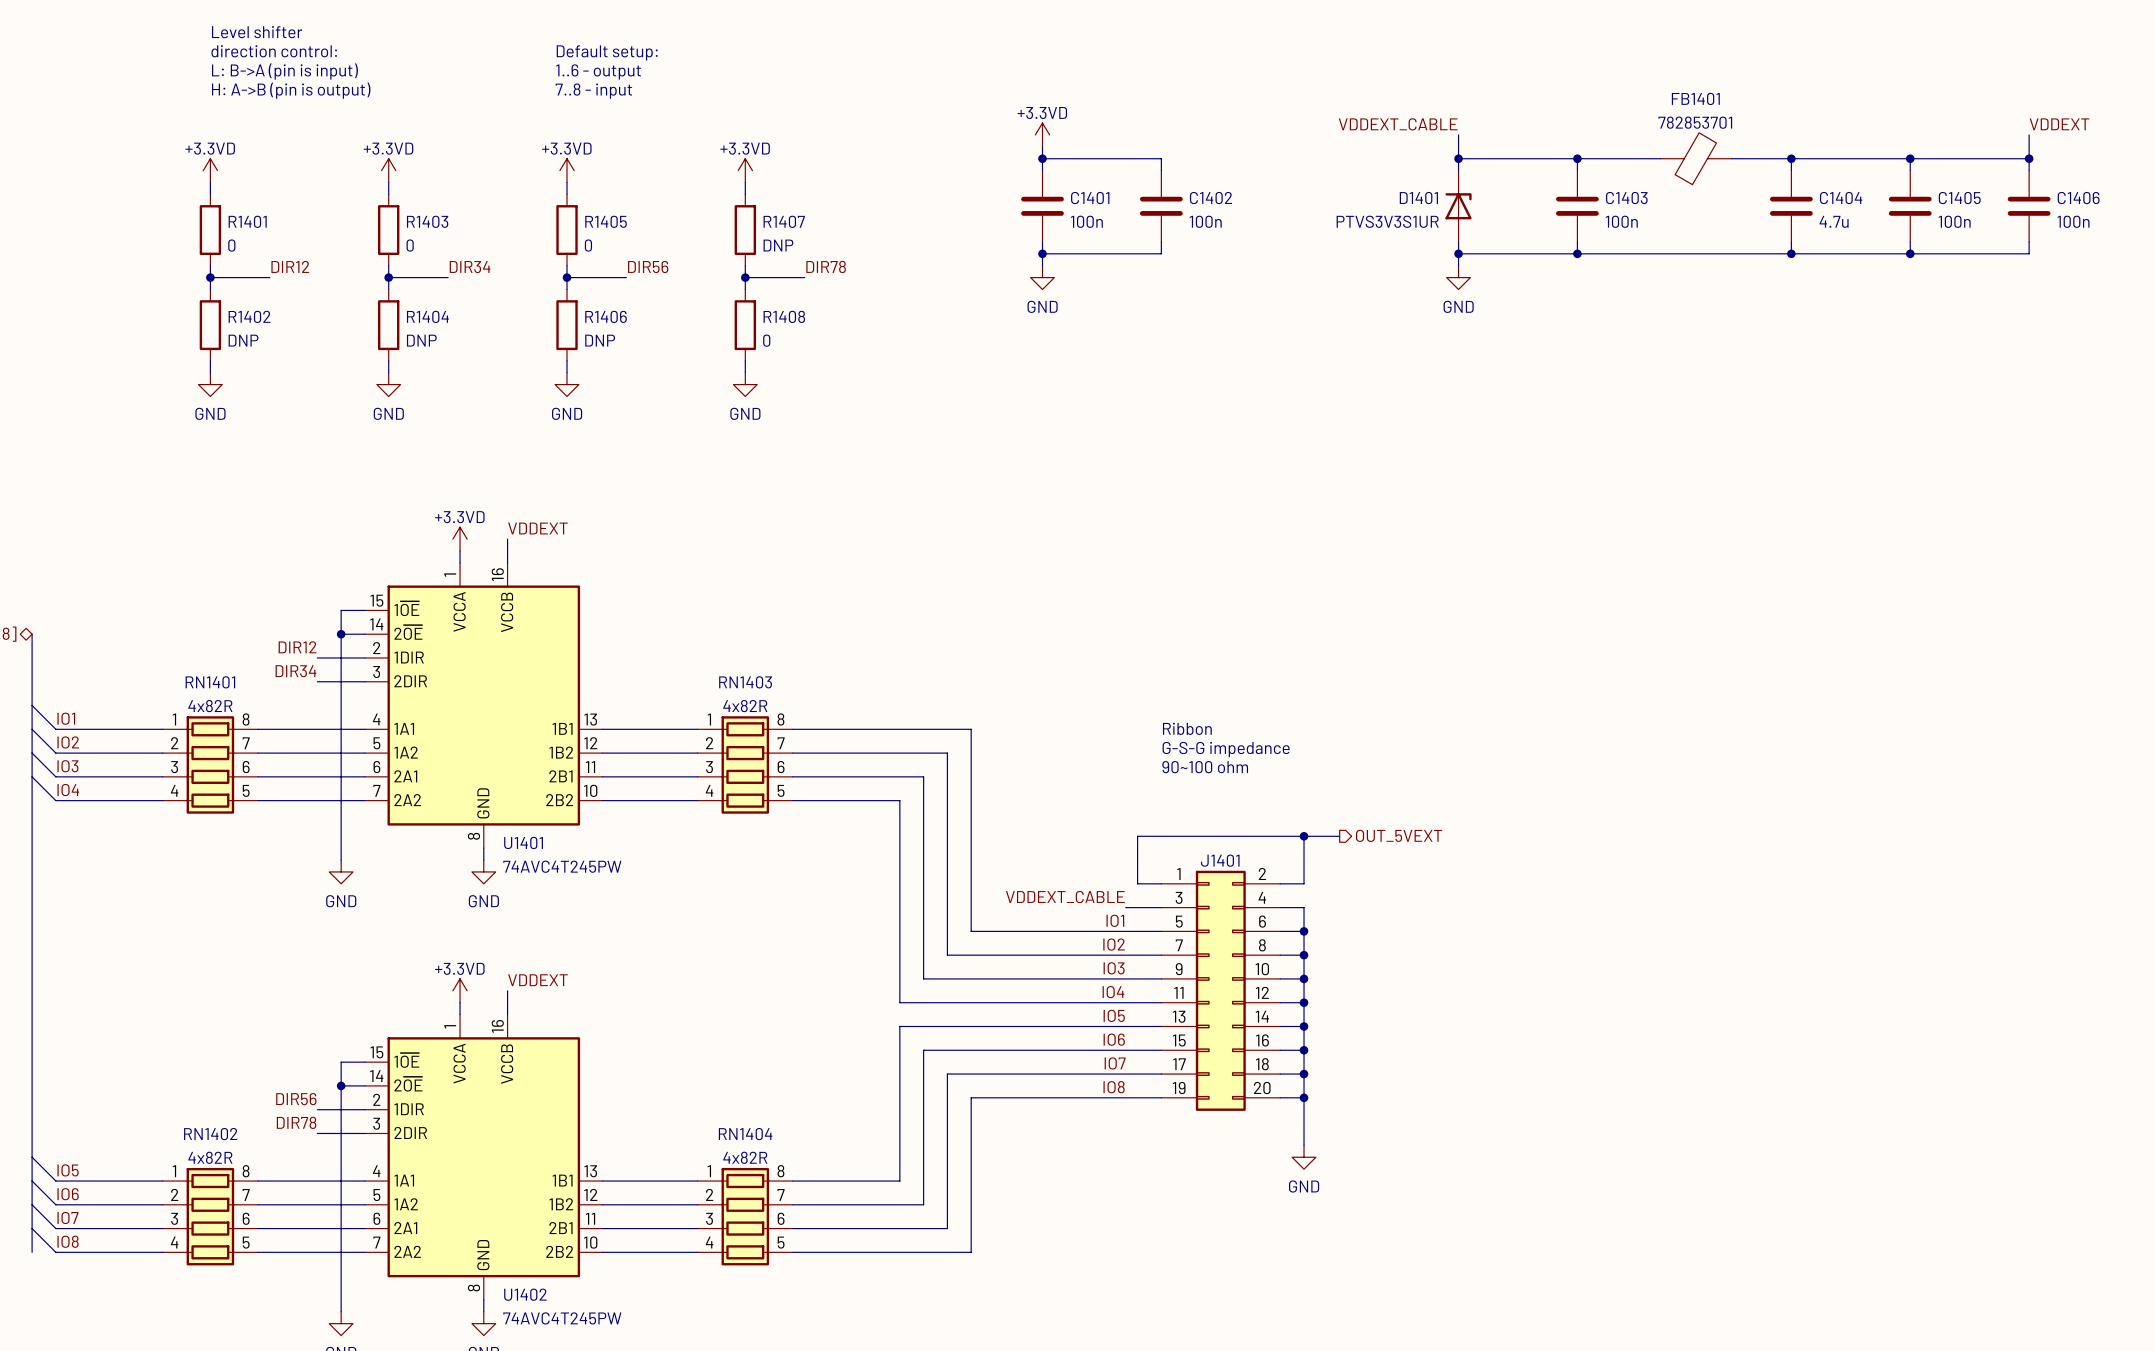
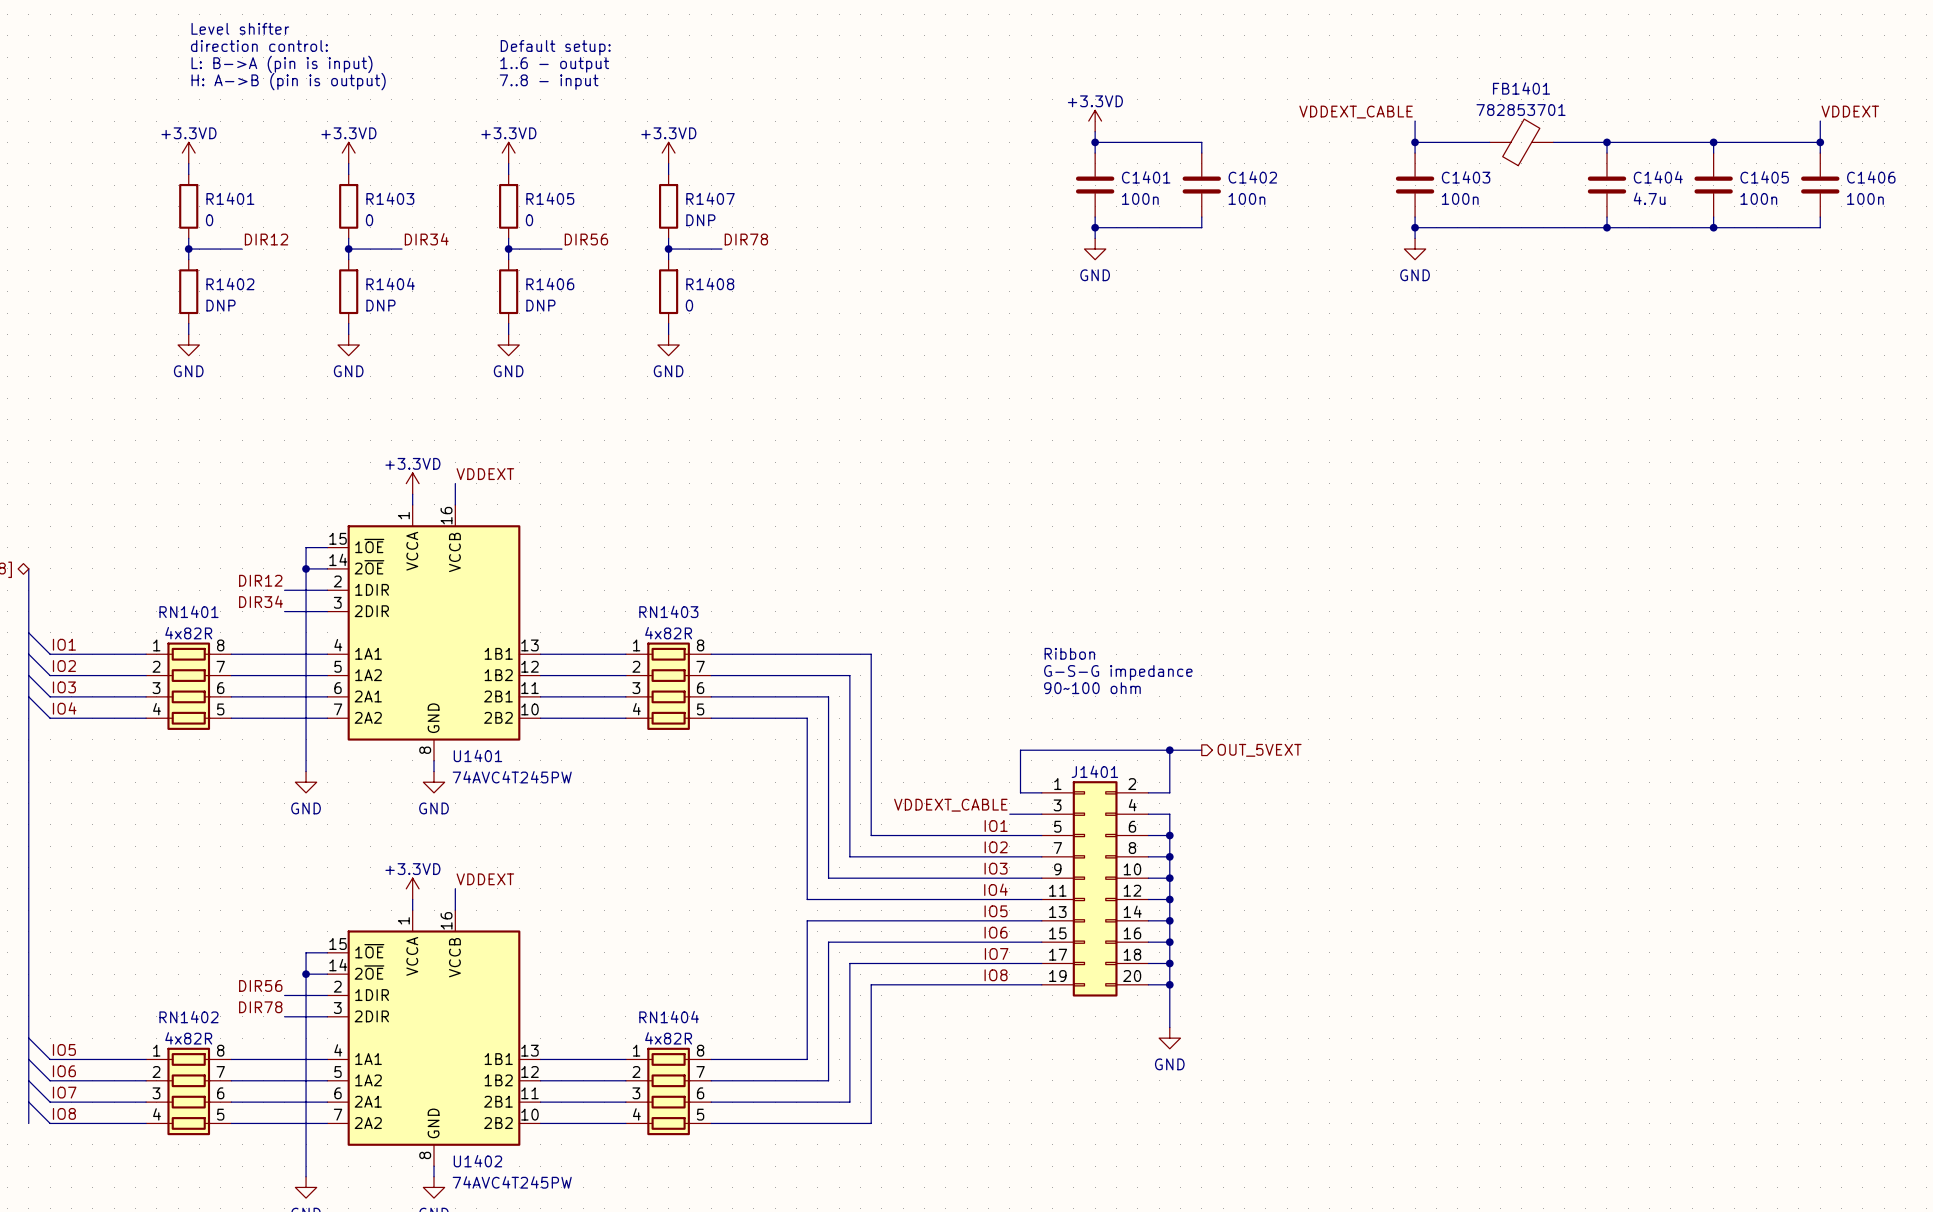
label position: VDDEXT_CABLE (1398, 124) -> VDDEXT_CABLE (1356, 112)
power symbol position: +3.3VD (1042, 134) -> +3.3VD (1095, 121)
wire: (1458, 134) (1458, 170) -> none
wire: (1042, 146) (1042, 170) -> (1095, 131) (1095, 153)
wire: (1042, 158) (1161, 158) (1161, 170) -> (1095, 142) (1201, 142) (1201, 153)
junction: (1042, 158) -> none
junction: none -> (1095, 142)
wire: (1458, 158) (1577, 158) -> (1415, 121) (1415, 142)
junction: (1458, 158) -> none
C1401 position: (1042, 206) -> (1095, 185)
C1402 position: (1161, 206) -> (1201, 185)
D1401: PTVS3V3S1UR (1458, 206) -> none
wire: (1042, 241) (1042, 265) -> (1095, 217) (1095, 238)
wire: (1161, 241) (1161, 253) (1042, 253) -> (1201, 217) (1201, 227) (1095, 227)
wire: (1458, 241) (1458, 265) -> none
junction: (1042, 253) -> none
junction: none -> (1095, 227)
wire: (1458, 253) (1577, 253) -> (1415, 238) (1415, 227)
junction: (1458, 253) -> none
power symbol: GND (1042, 277) -> none
power symbol: none -> GND (1095, 249)
power symbol: GND (1458, 277) -> none
power symbol: none -> GND (1415, 249)

